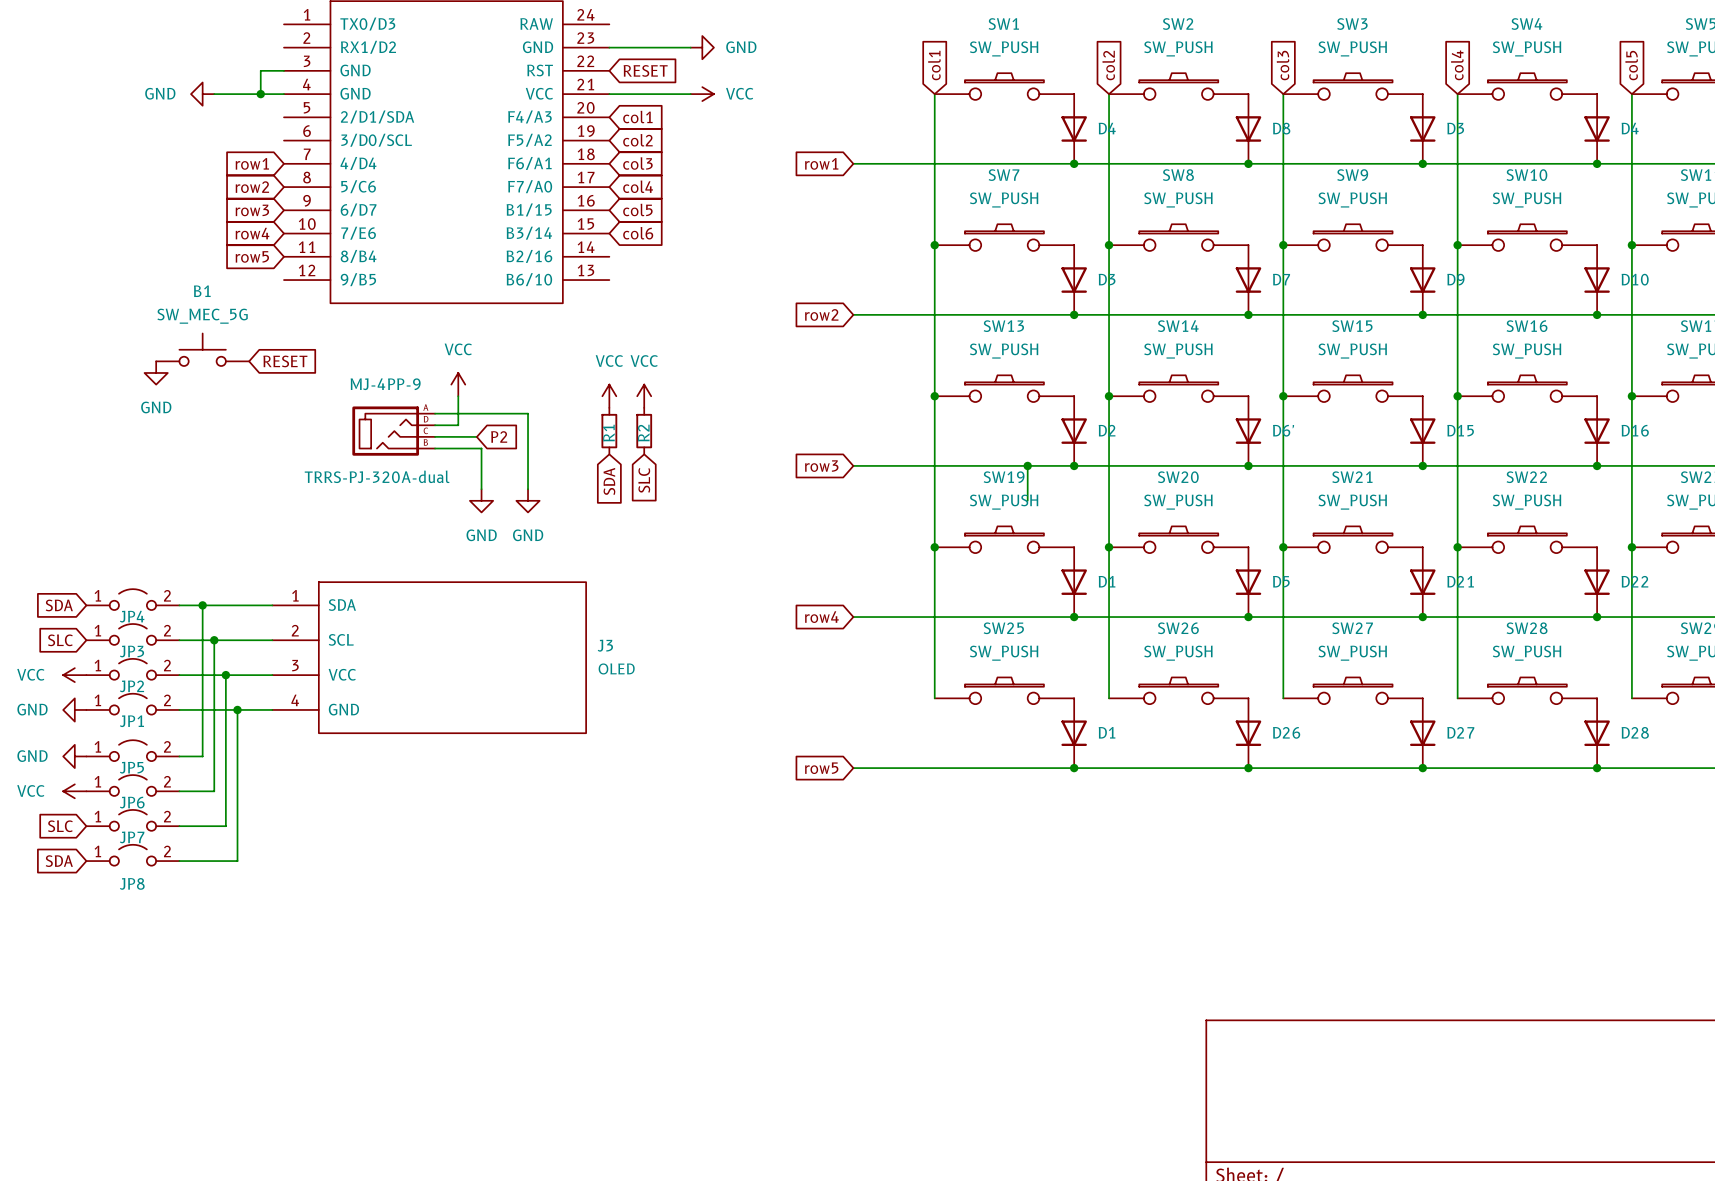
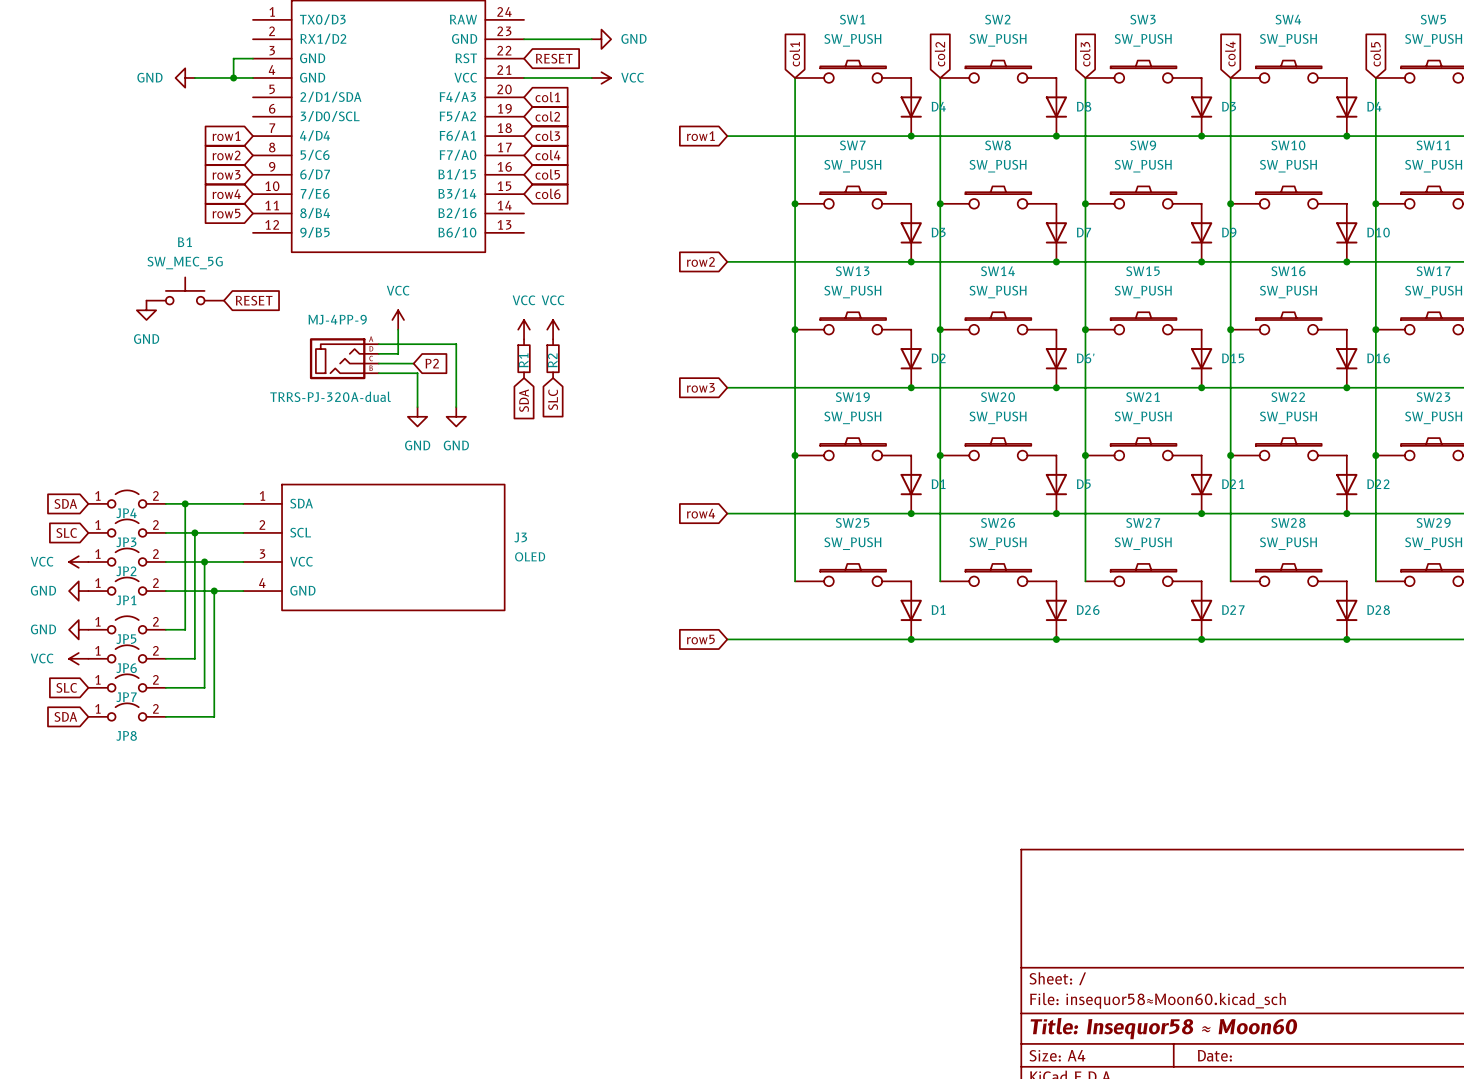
wire: (1027, 465) (1027, 500) -> none
junction: (1027, 465) -> none

